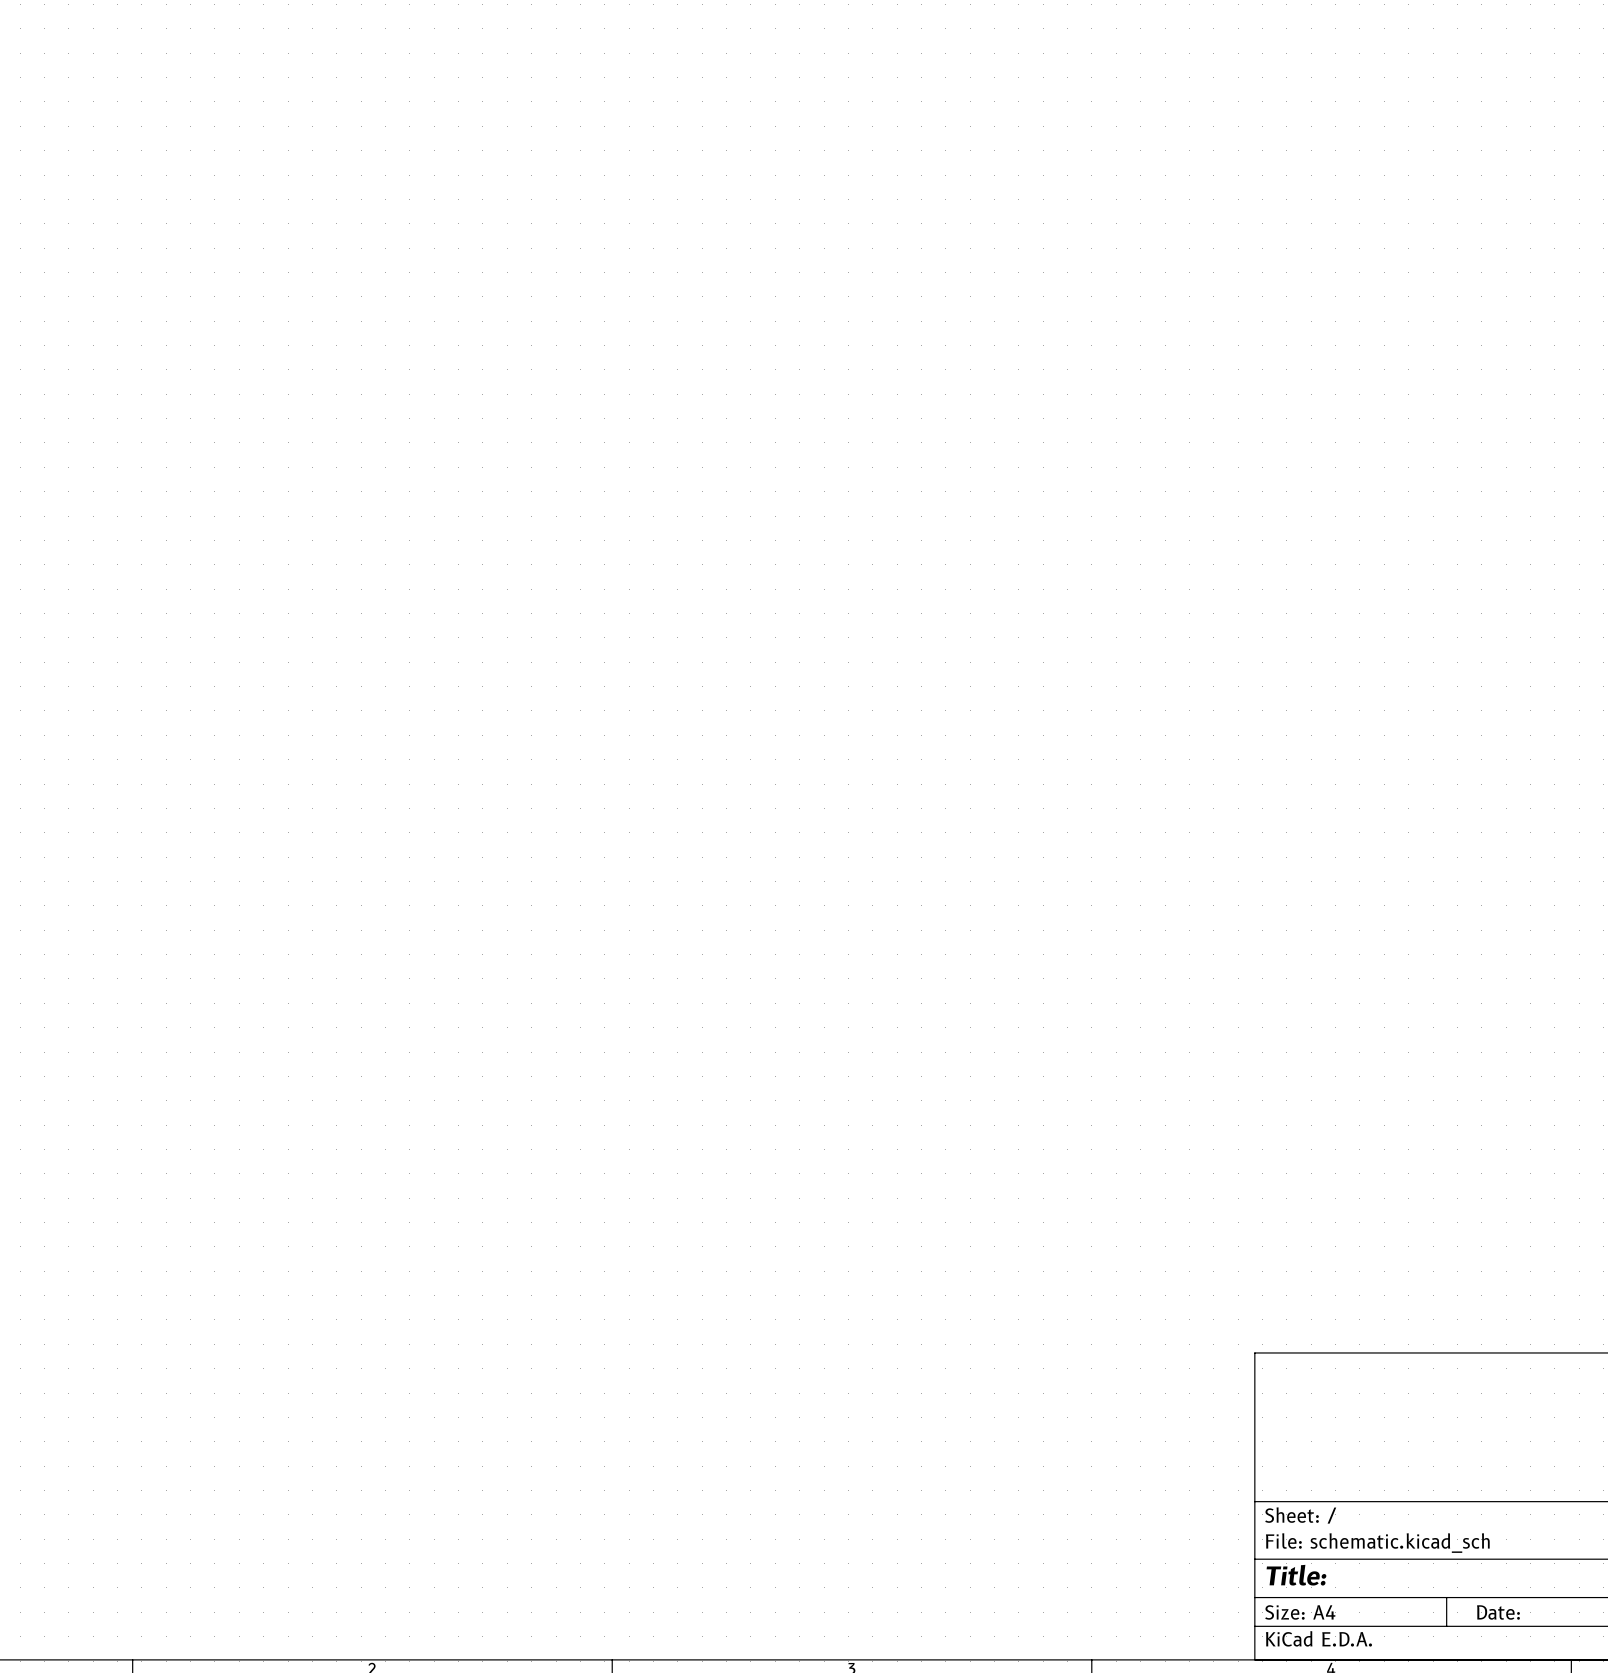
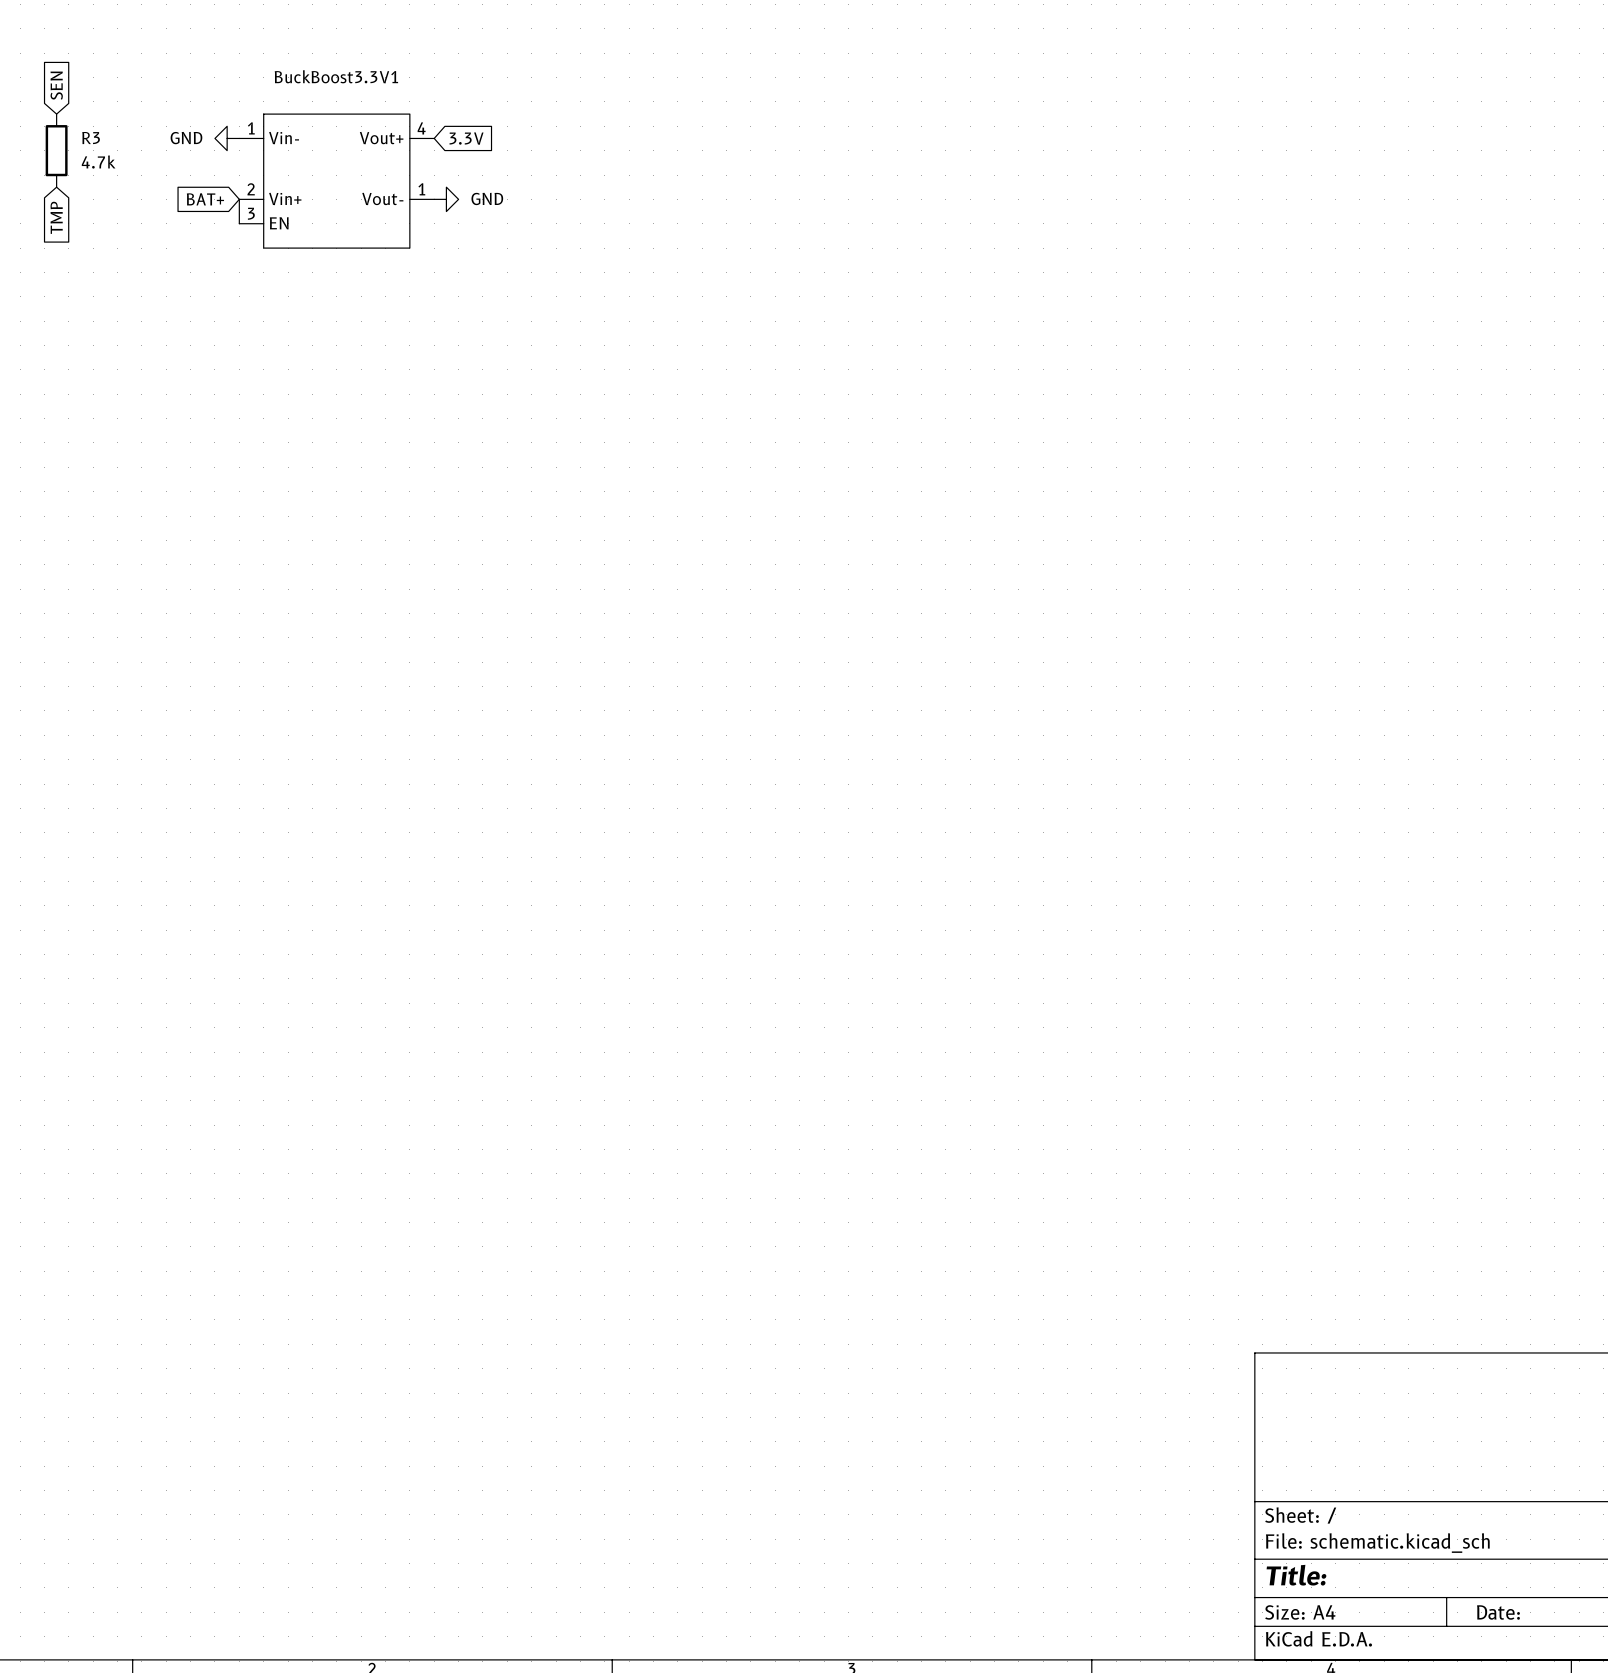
global label: none -> SEN (56, 85)
power symbol: none -> GND (227, 138)
global label: none -> 3.3V (466, 138)
R3: none -> 4.7k (56, 150)
BuckBoost3.3V1: none -> (336, 181)
global label: none -> BAT+ (205, 199)
wire: none -> (239, 199) (239, 223)
power symbol: none -> GND (446, 199)
global label: none -> TMP (56, 217)

